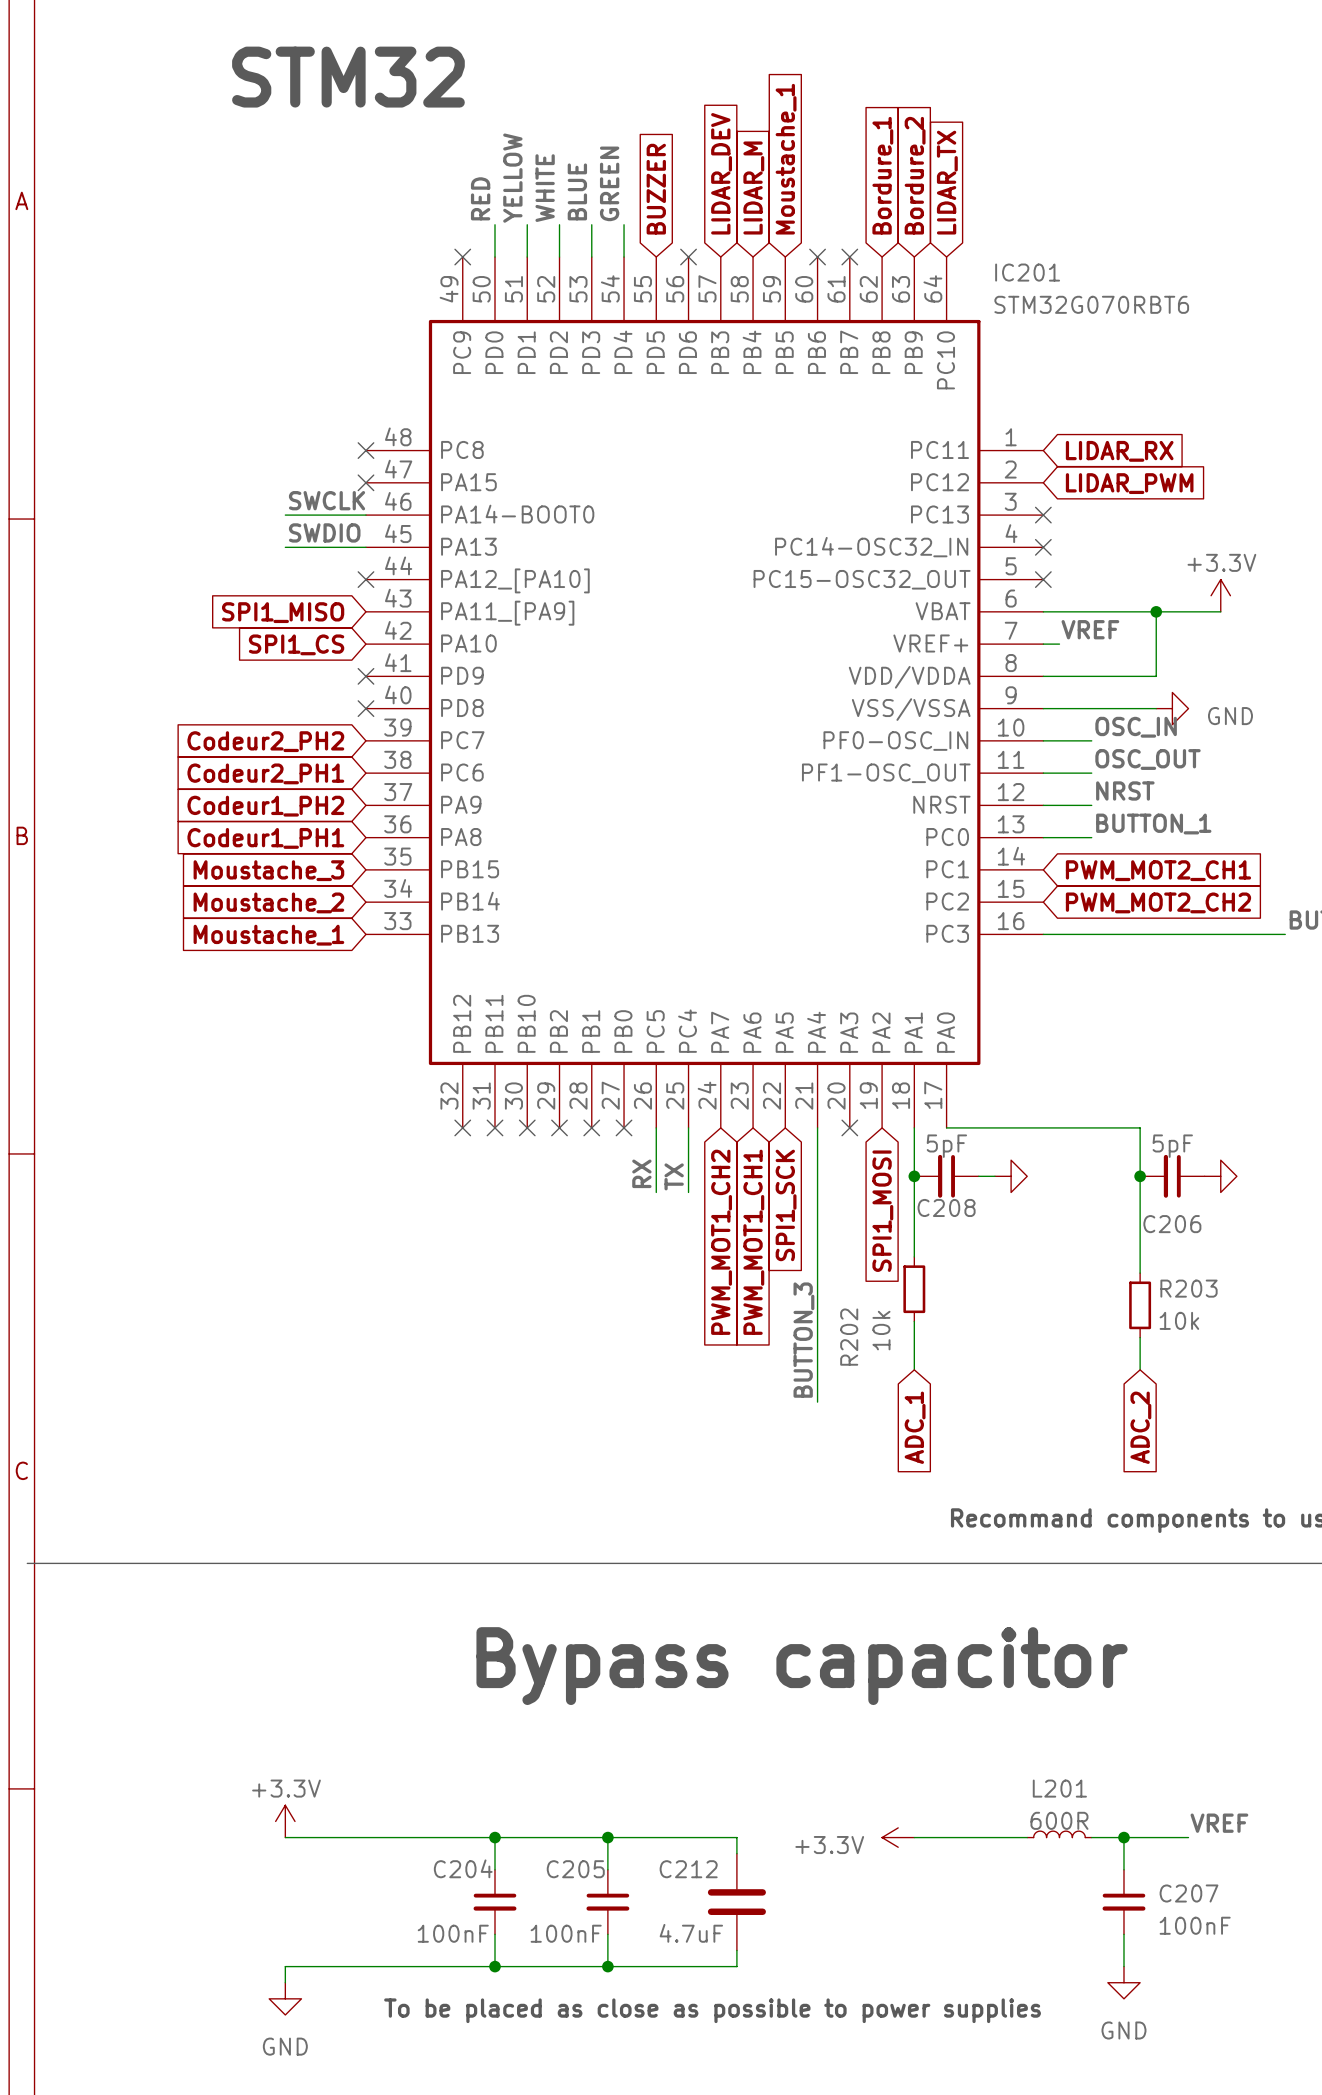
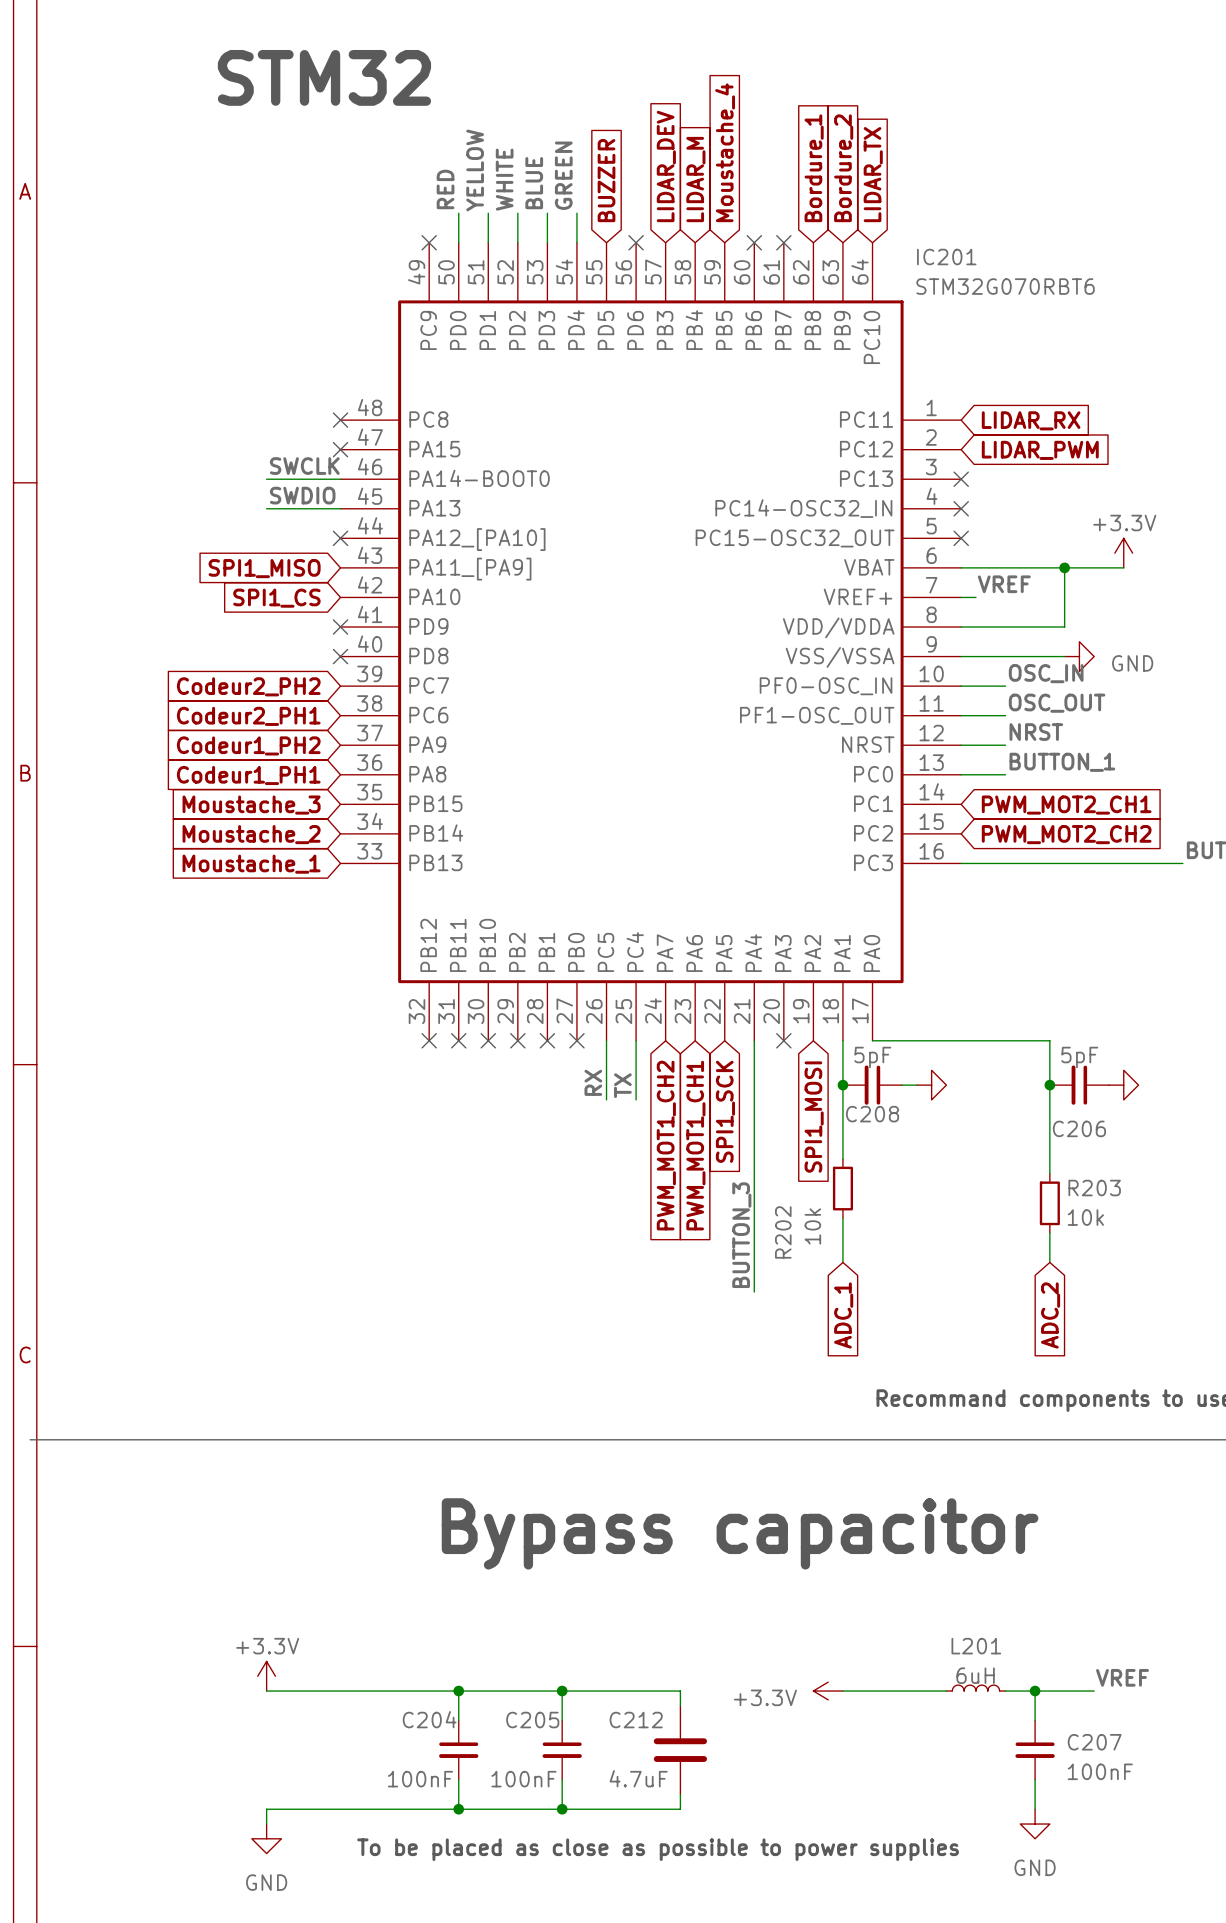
global label: Moustache_1 (786, 159) -> Moustache_4 (725, 152)
L201 value: 600R (1059, 1820) -> 6uH (975, 1675)

